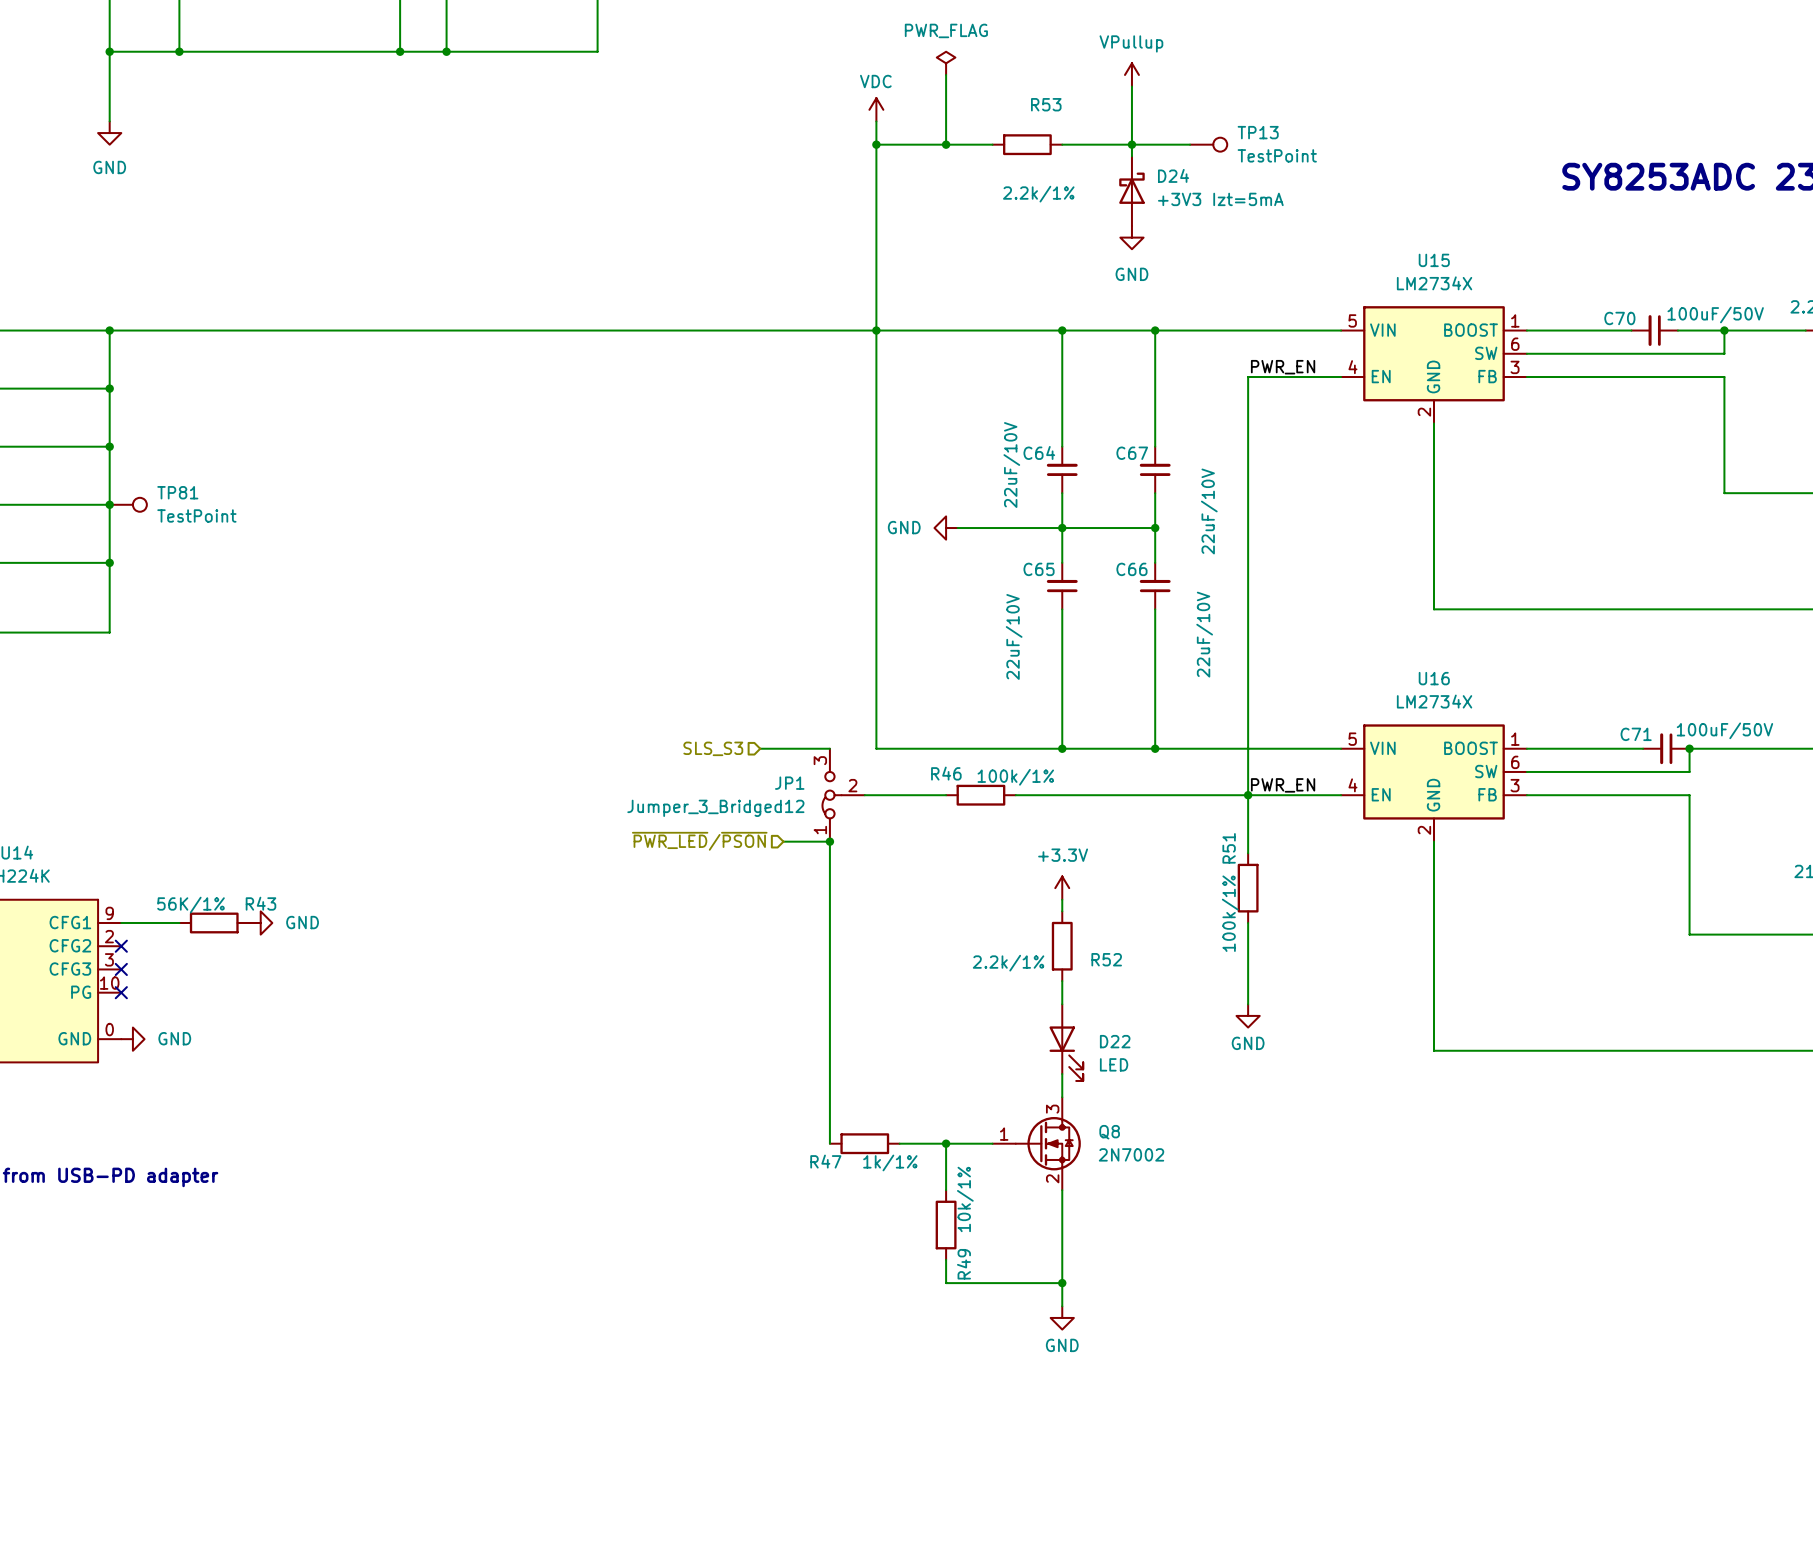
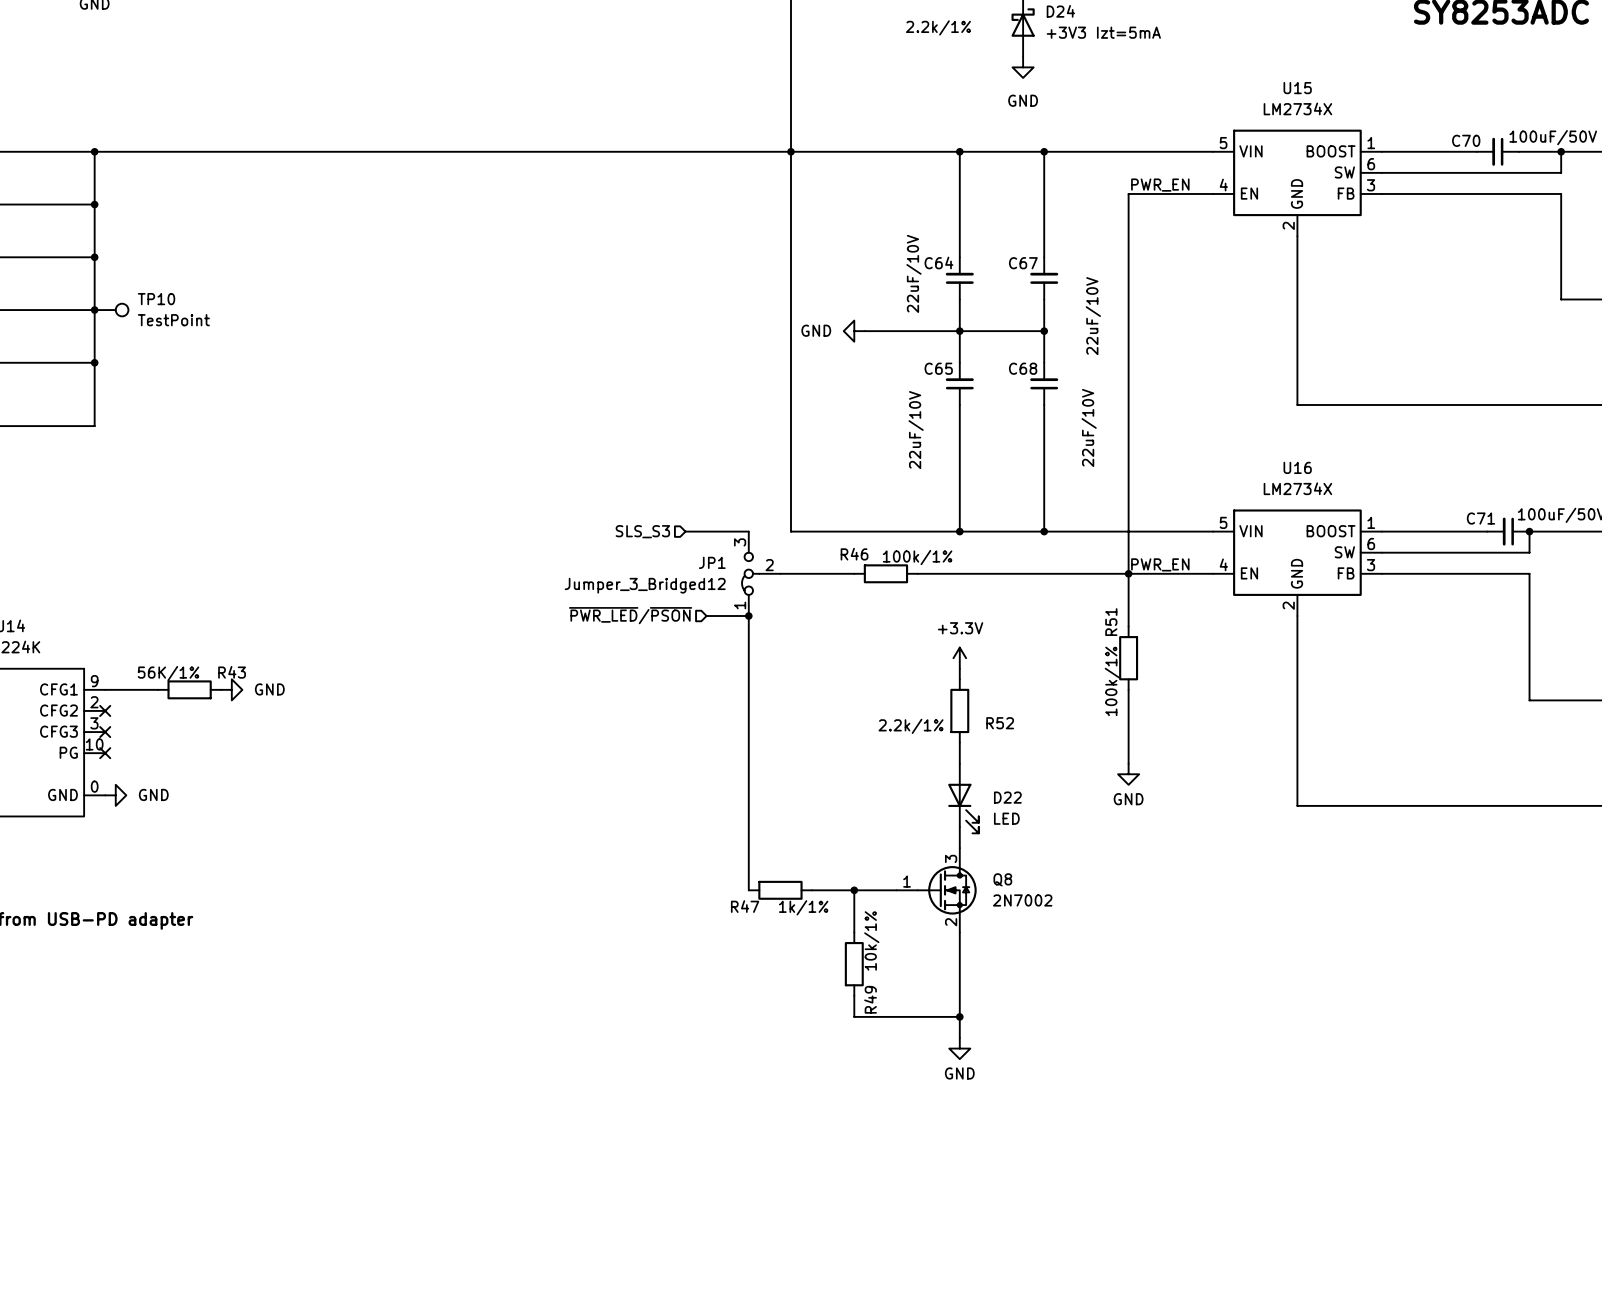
TP81 name: TP81 (177, 492) -> TP10 (156, 299)
C66 name: C66 (1131, 569) -> C68 (1023, 368)

